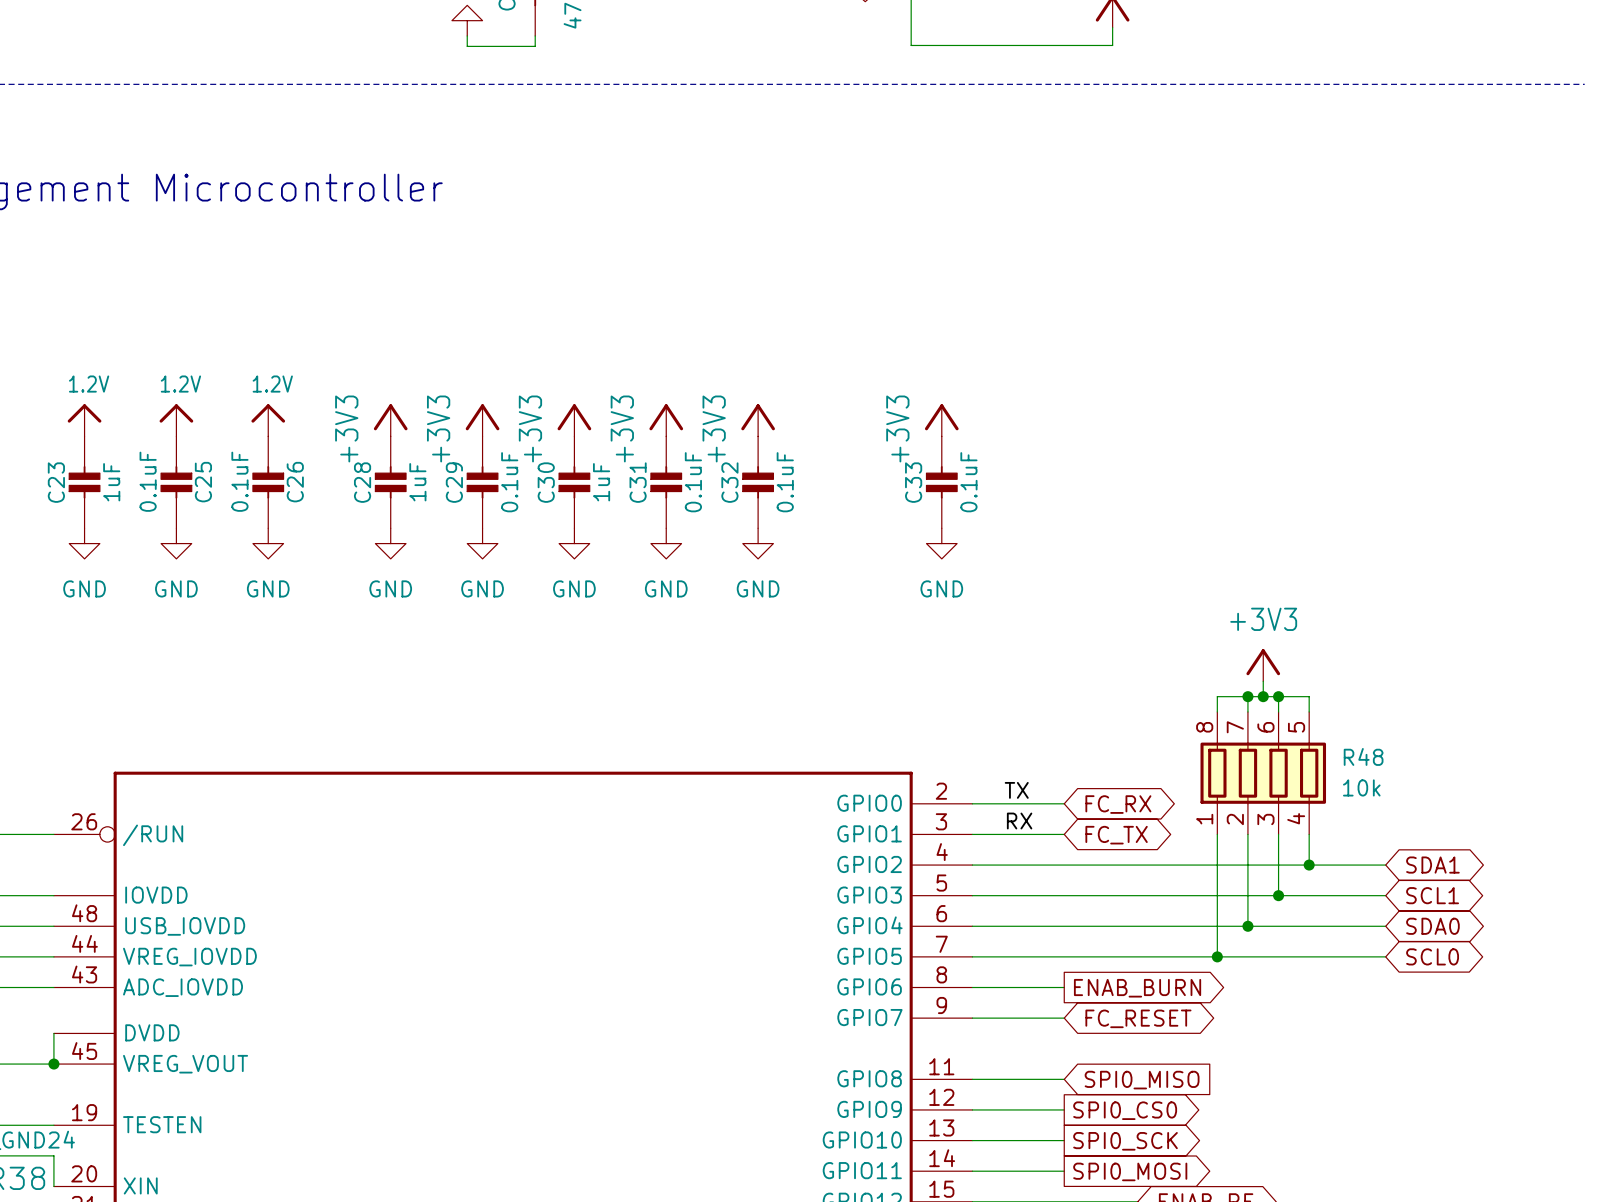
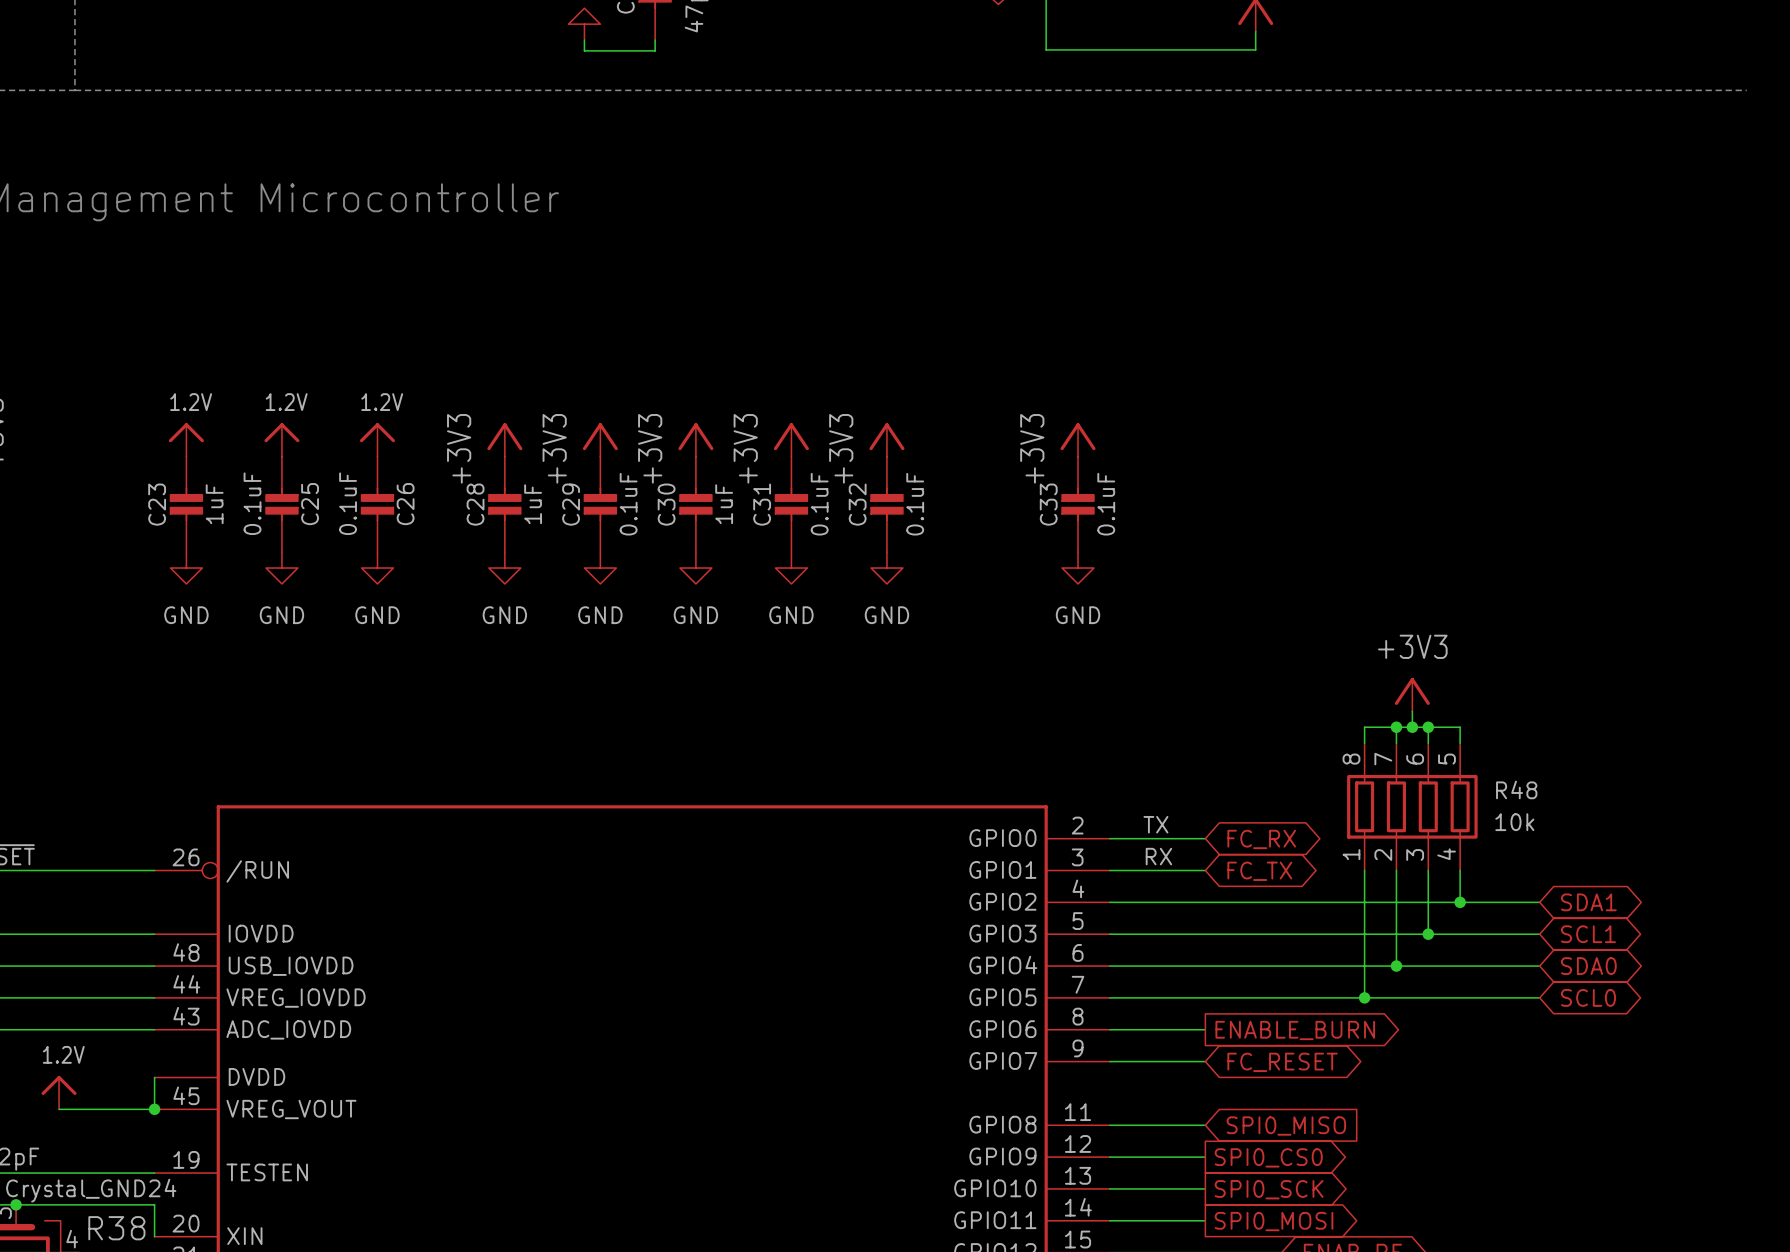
global label: ENAB_BURN (1137, 988) -> ENABLE_BURN (1295, 1030)

